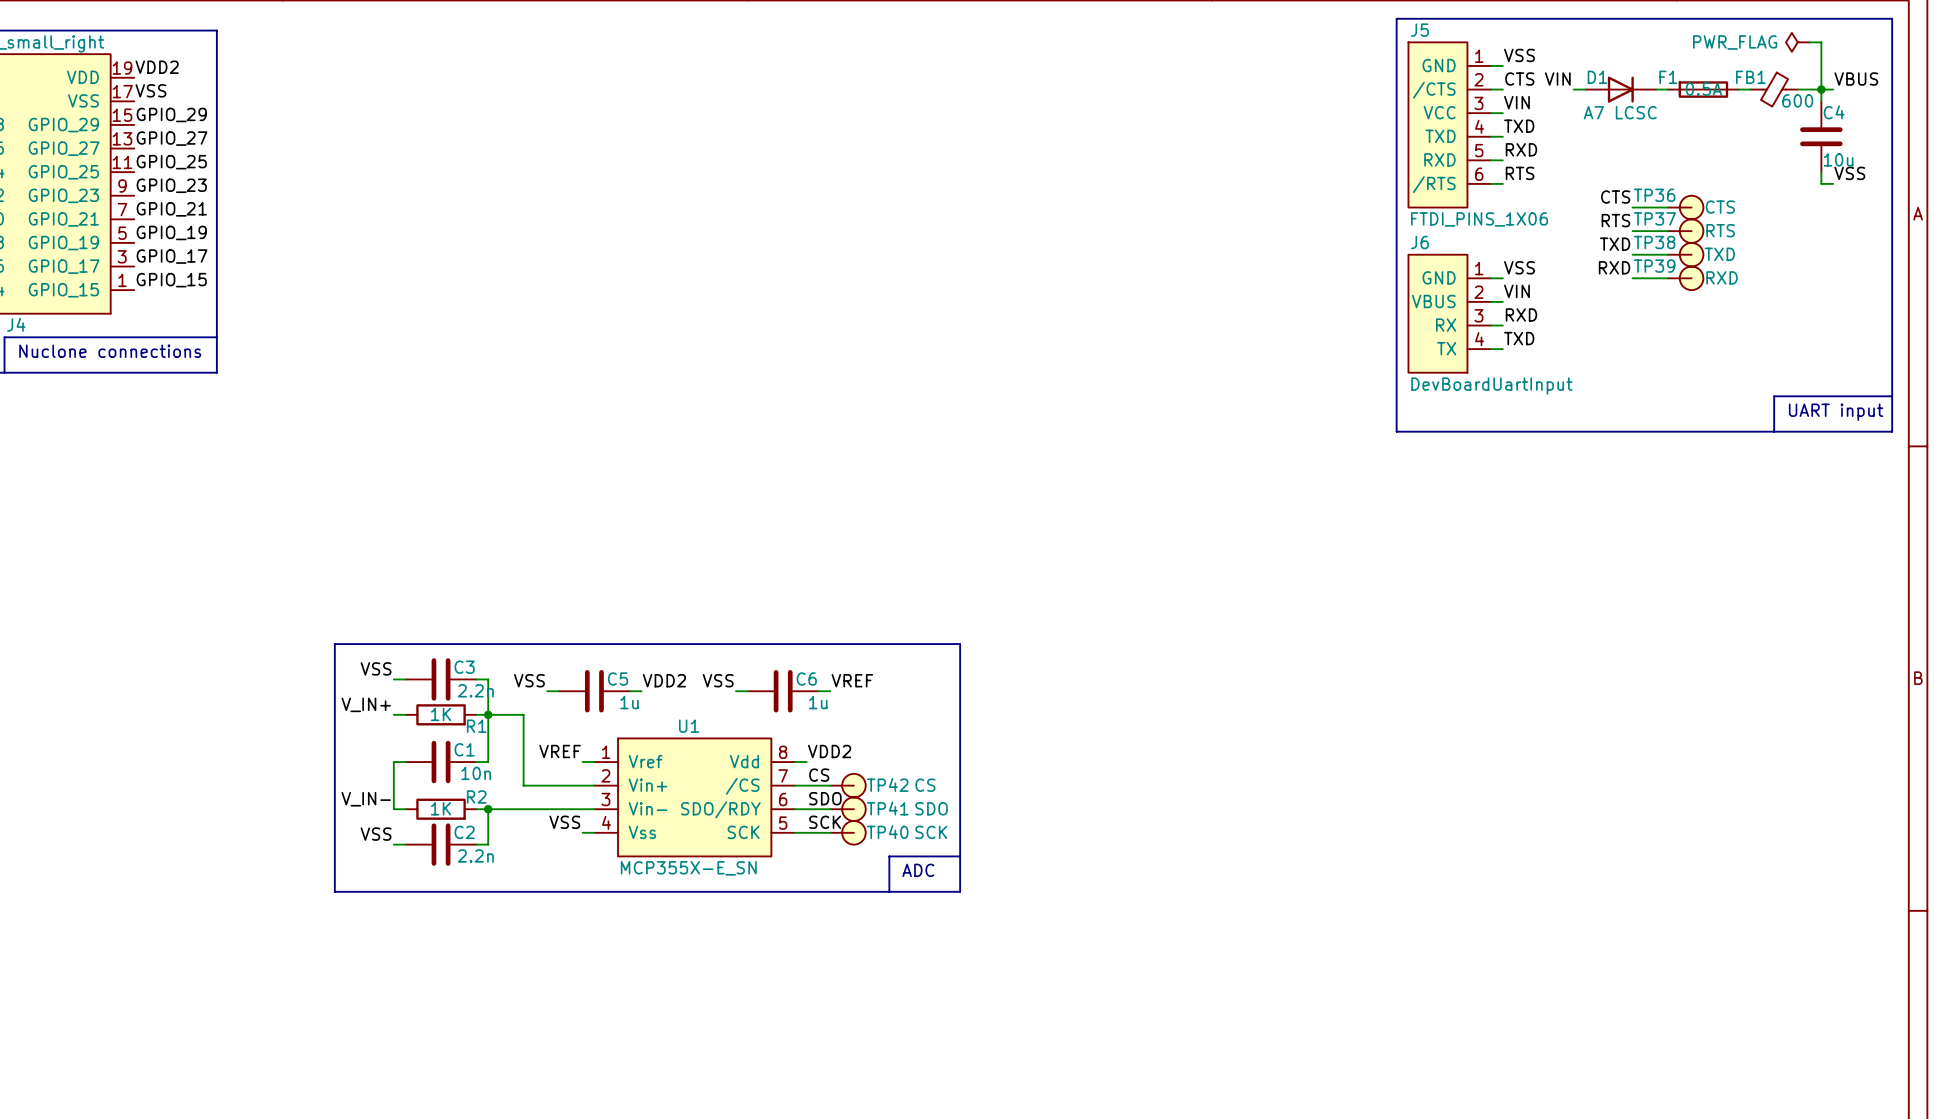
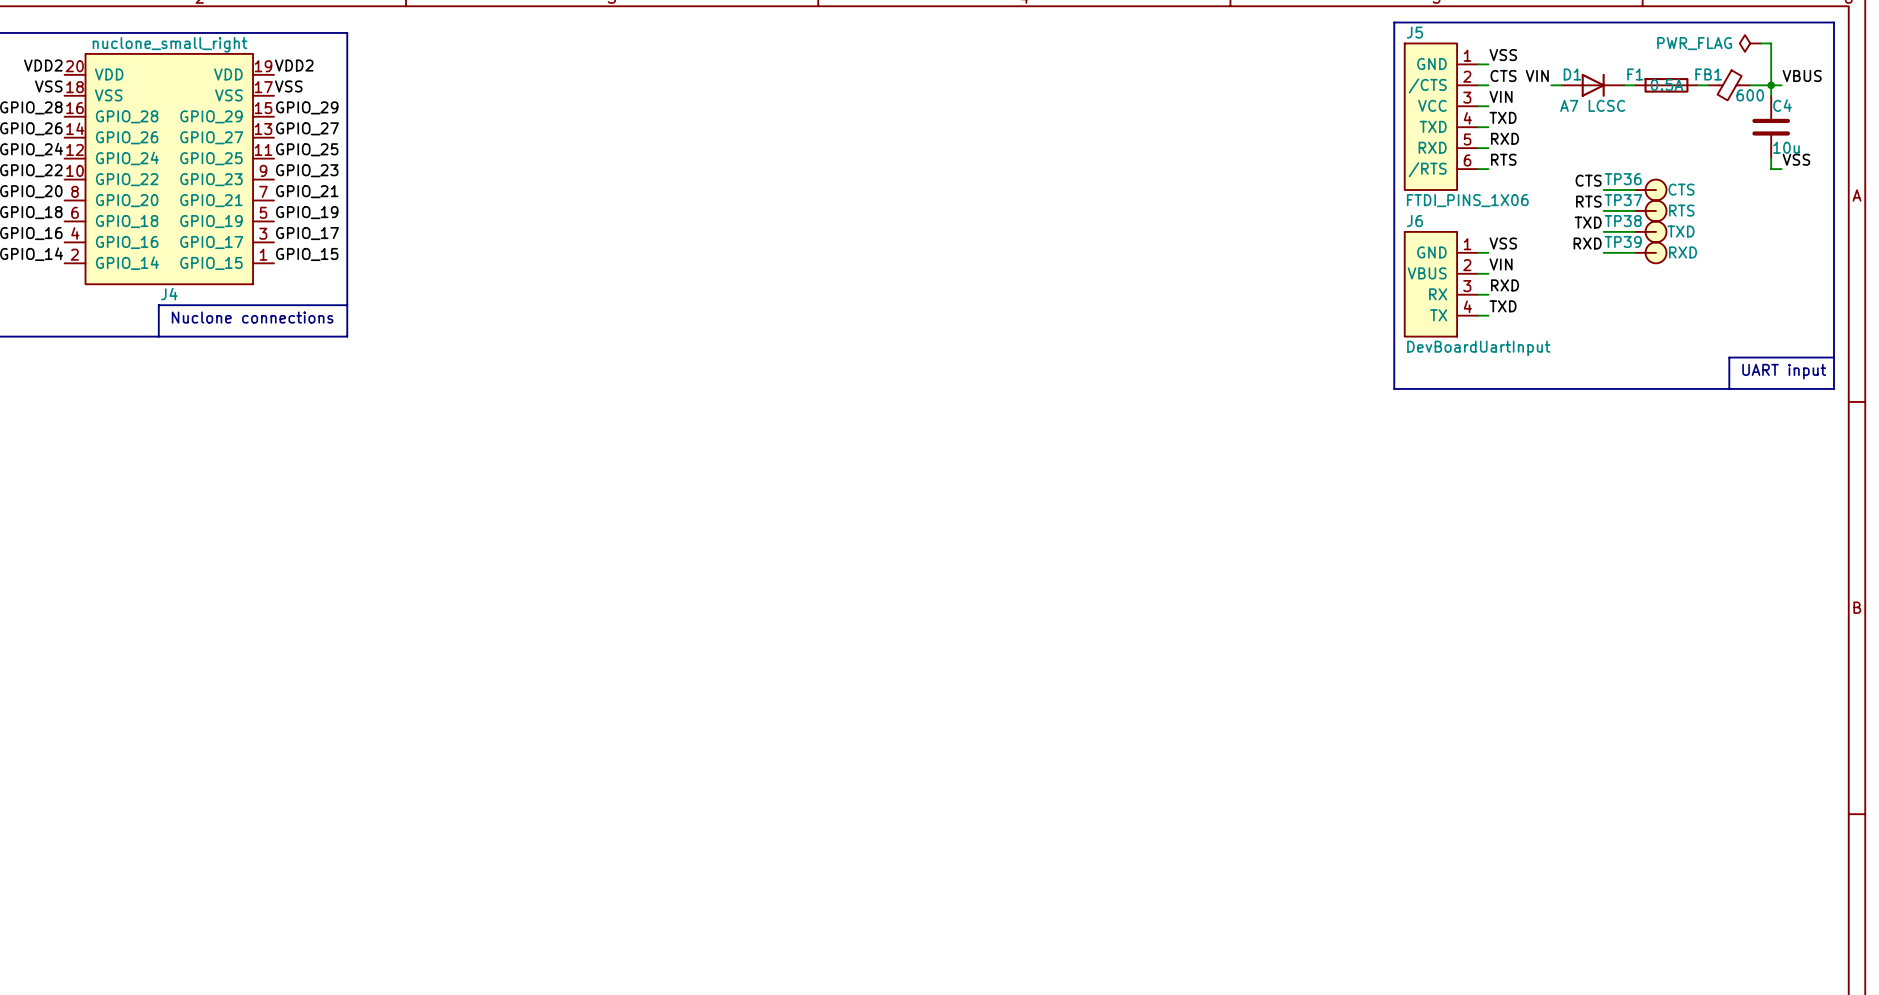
line: (334, 644) (960, 644) (960, 891) (334, 891) (334, 644) -> none
label: VSS (376, 668) -> none
wire: (393, 679) (405, 679) -> none
C3: 2.2n (441, 679) -> none
wire: (476, 679) (488, 679) (488, 762) (476, 762) -> none
label: VSS (529, 680) -> none
label: VDD2 (664, 680) -> none
label: VSS (718, 680) -> none
label: VREF (852, 680) -> none
wire: (547, 691) (559, 691) -> none
C5: 1u (594, 691) -> none
wire: (629, 691) (641, 691) -> none
wire: (735, 691) (747, 691) -> none
C6: 1u (783, 691) -> none
wire: (818, 691) (830, 691) -> none
label: V_IN+ (366, 704) -> none
wire: (393, 714) (405, 714) -> none
R1: 1K (441, 714) -> none
wire: (476, 714) (523, 714) (523, 785) (594, 785) -> none
junction: (488, 714) -> none
label: VREF (560, 751) -> none
label: VDD2 (829, 751) -> none
wire: (405, 762) (393, 762) (393, 809) (405, 809) -> none
C1: 10n (441, 762) -> none
wire: (582, 762) (594, 762) -> none
wire: (794, 762) (806, 762) -> none
label: CS (819, 775) -> none
wire: (794, 785) (830, 785) -> none
TP42: CS (848, 785) -> none
U1: MCP355X-E_SN (694, 797) -> none
label: SDO (825, 798) -> none
label: V_IN- (366, 799) -> none
R2: 1K (441, 809) -> none
wire: (476, 809) (594, 809) -> none
wire: (488, 809) (488, 844) (476, 844) -> none
junction: (488, 809) -> none
wire: (794, 809) (830, 809) -> none
TP41: SDO (848, 809) -> none
label: VSS (564, 822) -> none
label: SCK (825, 822) -> none
wire: (582, 832) (594, 832) -> none
wire: (794, 832) (830, 832) -> none
TP40: SCK (848, 832) -> none
label: VSS (376, 834) -> none
wire: (393, 844) (405, 844) -> none
C2: 2.2n (441, 844) -> none
line: (960, 856) (889, 856) (889, 891) -> none
text: ADC (918, 870) -> none

